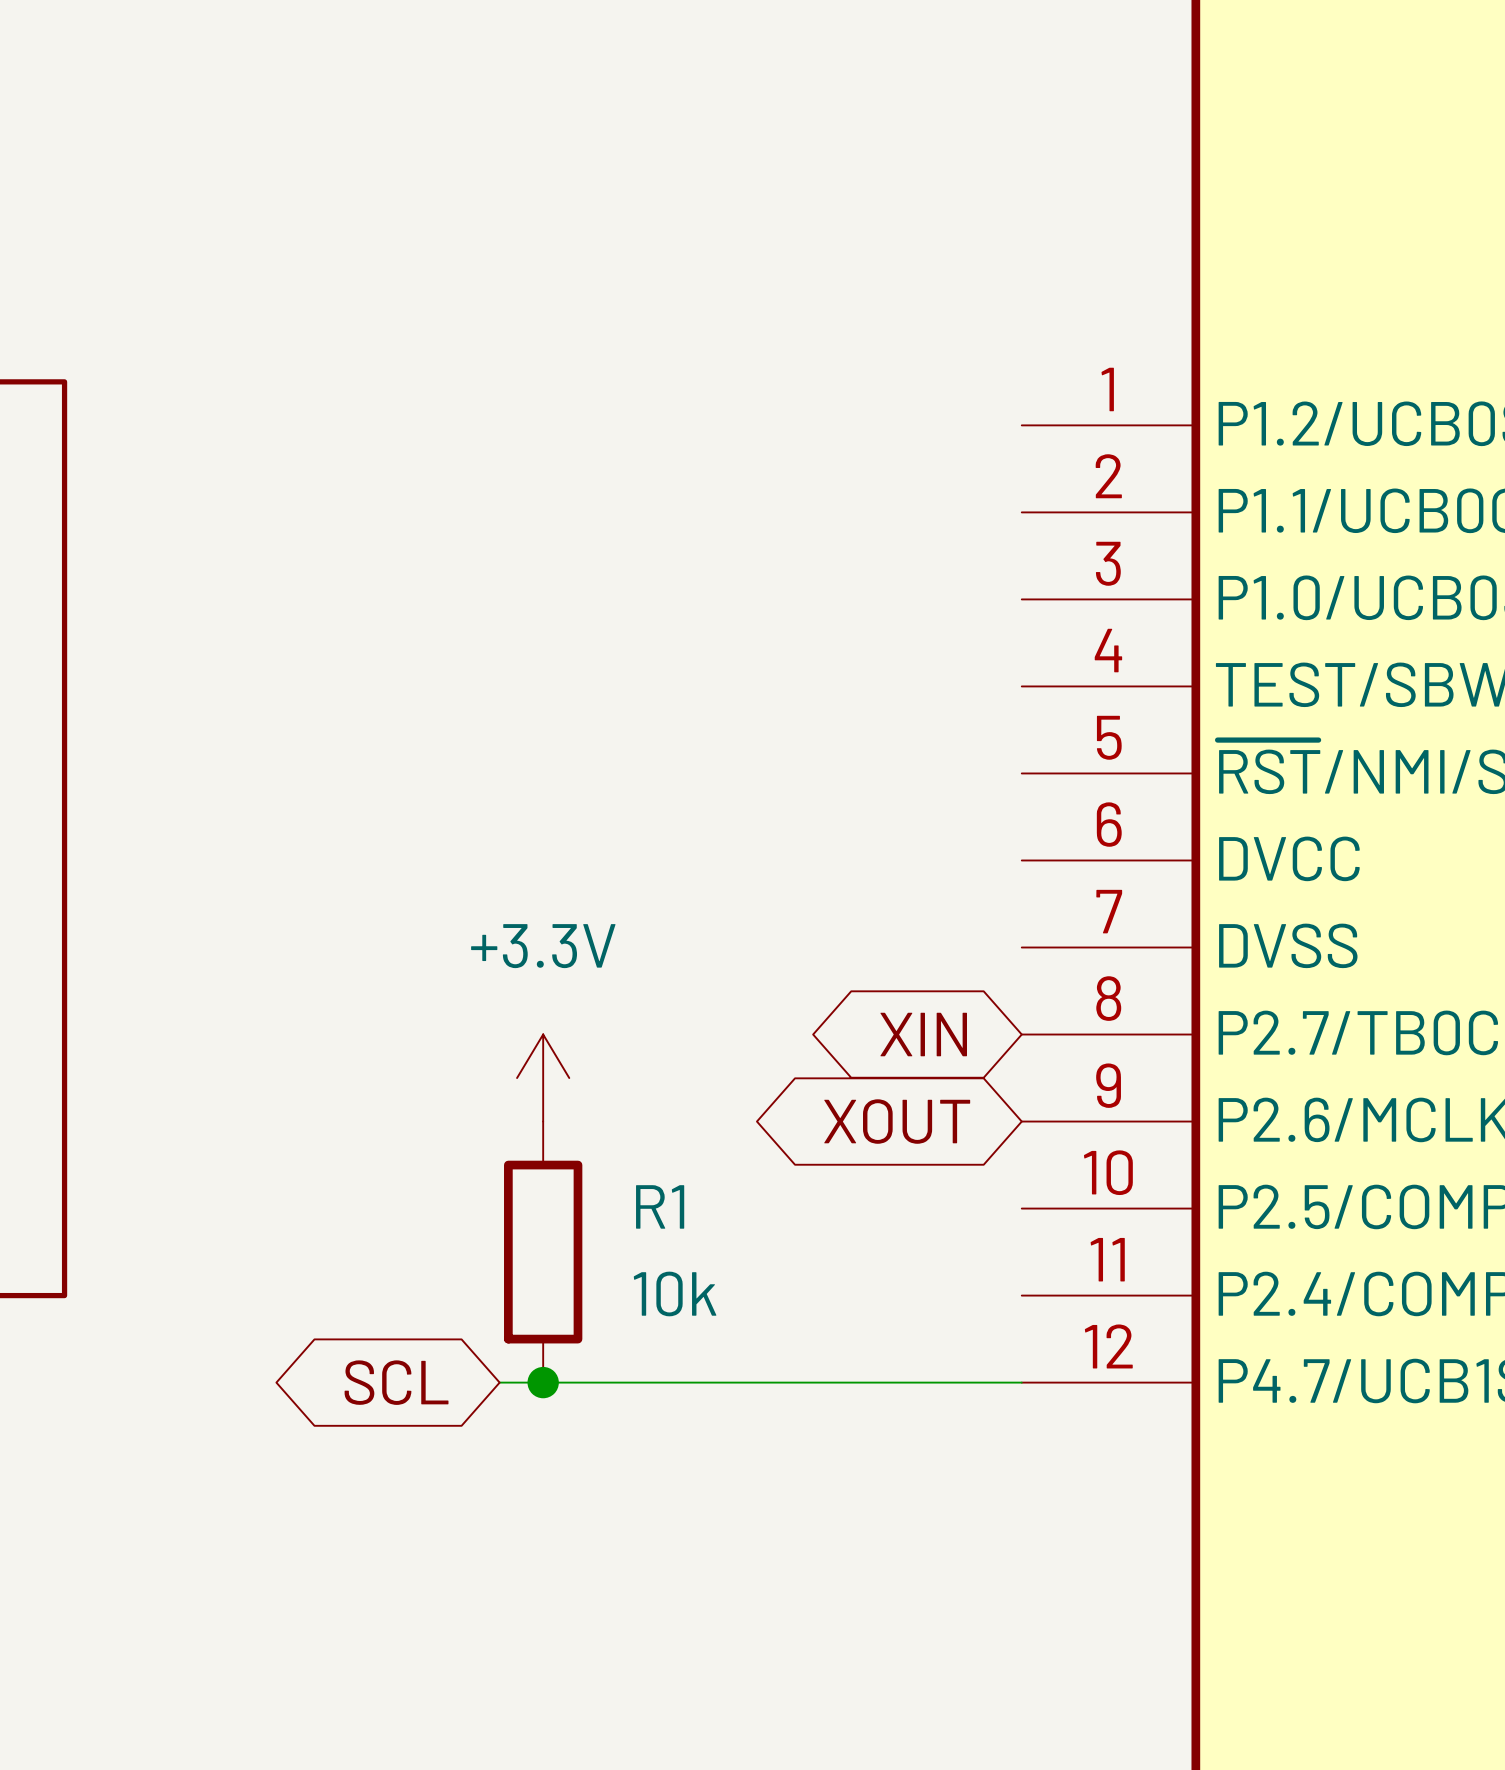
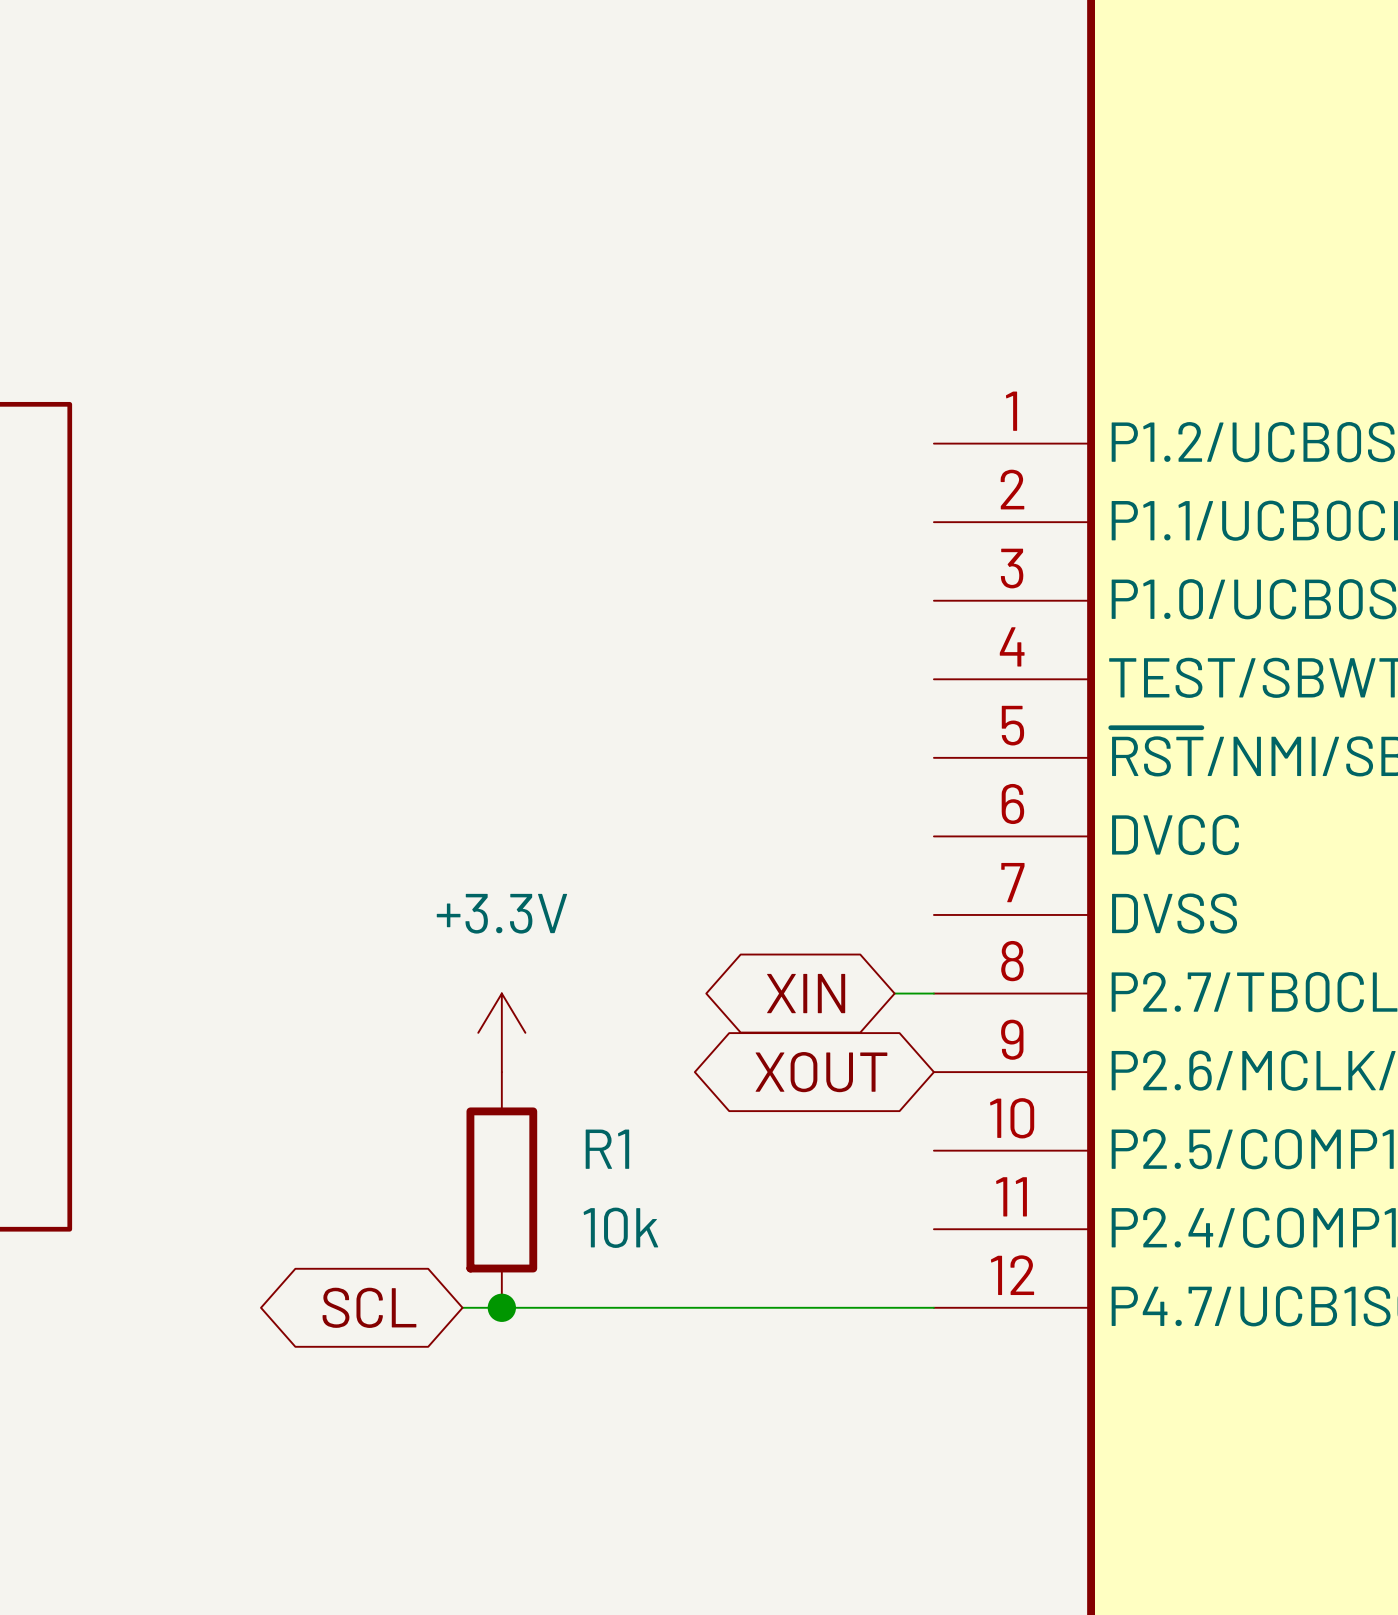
global label position: XIN (923, 1034) -> XIN (806, 993)
wire: none -> (894, 993) (933, 993)

